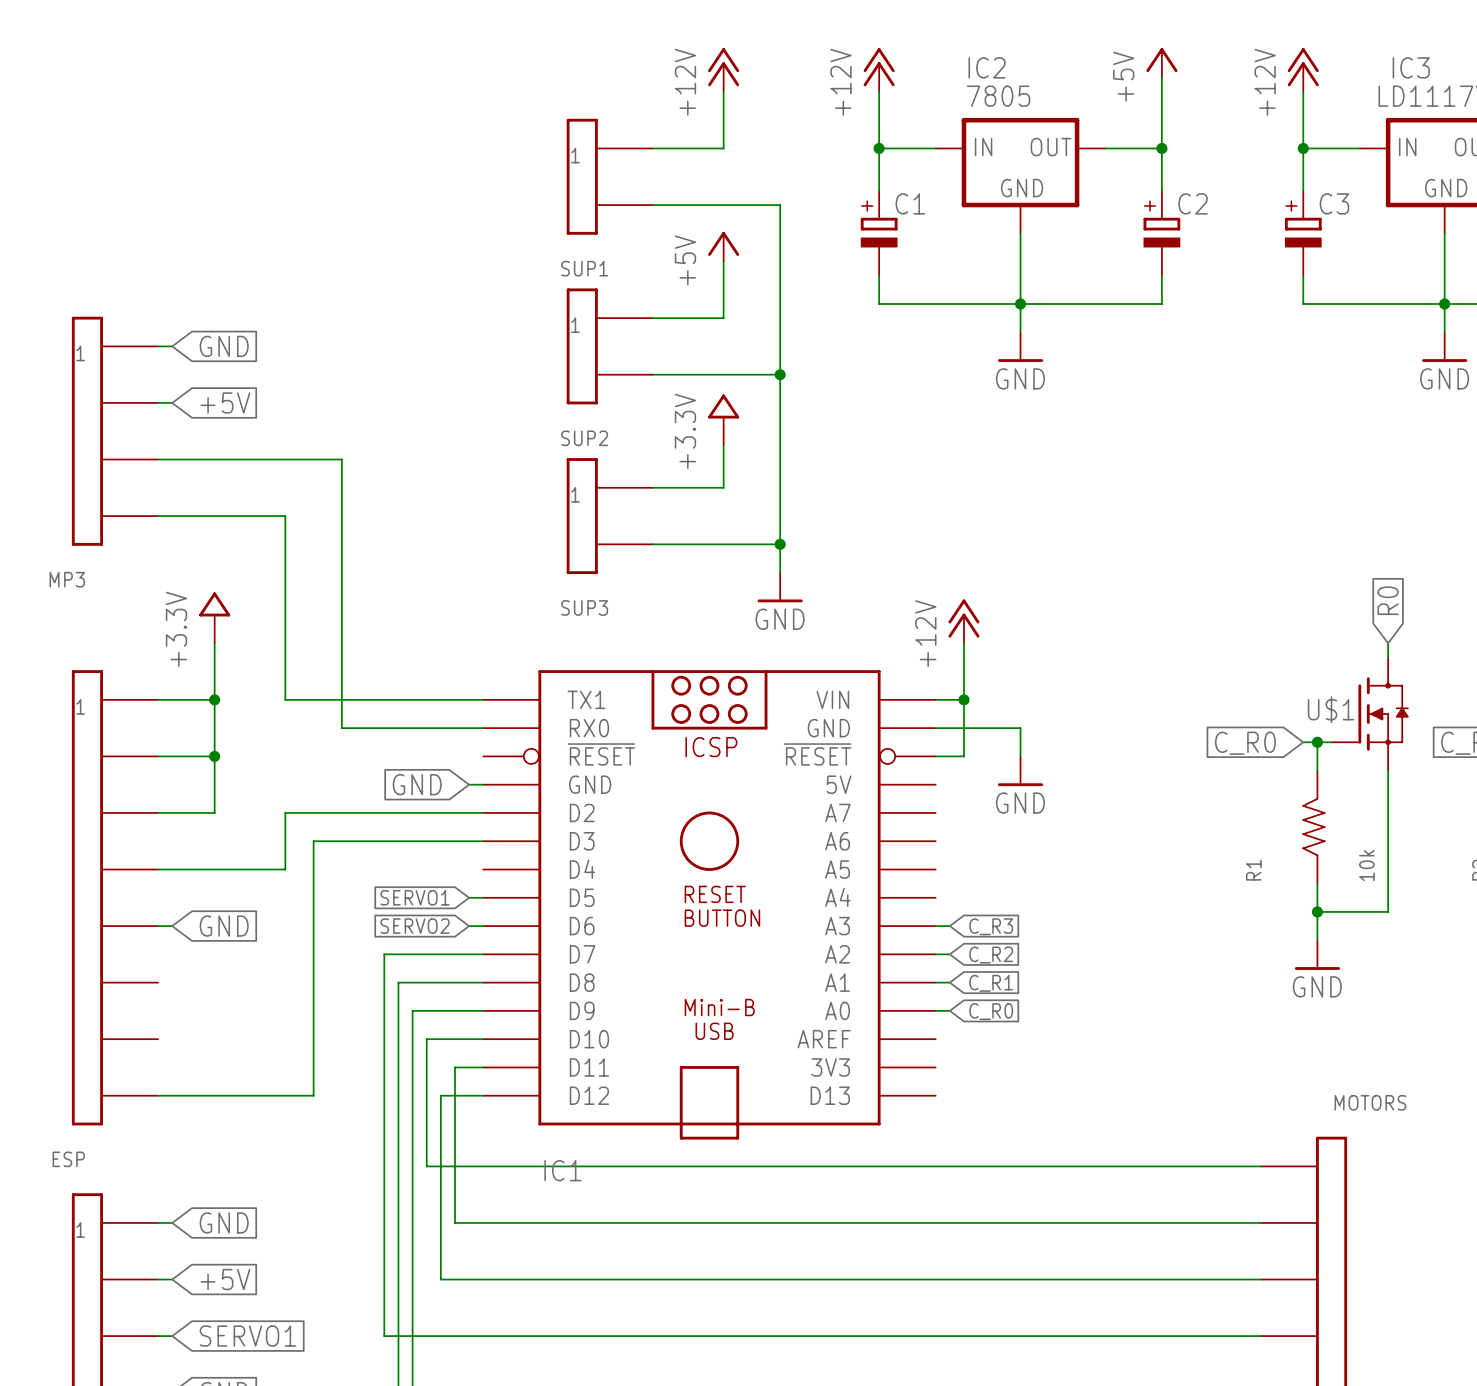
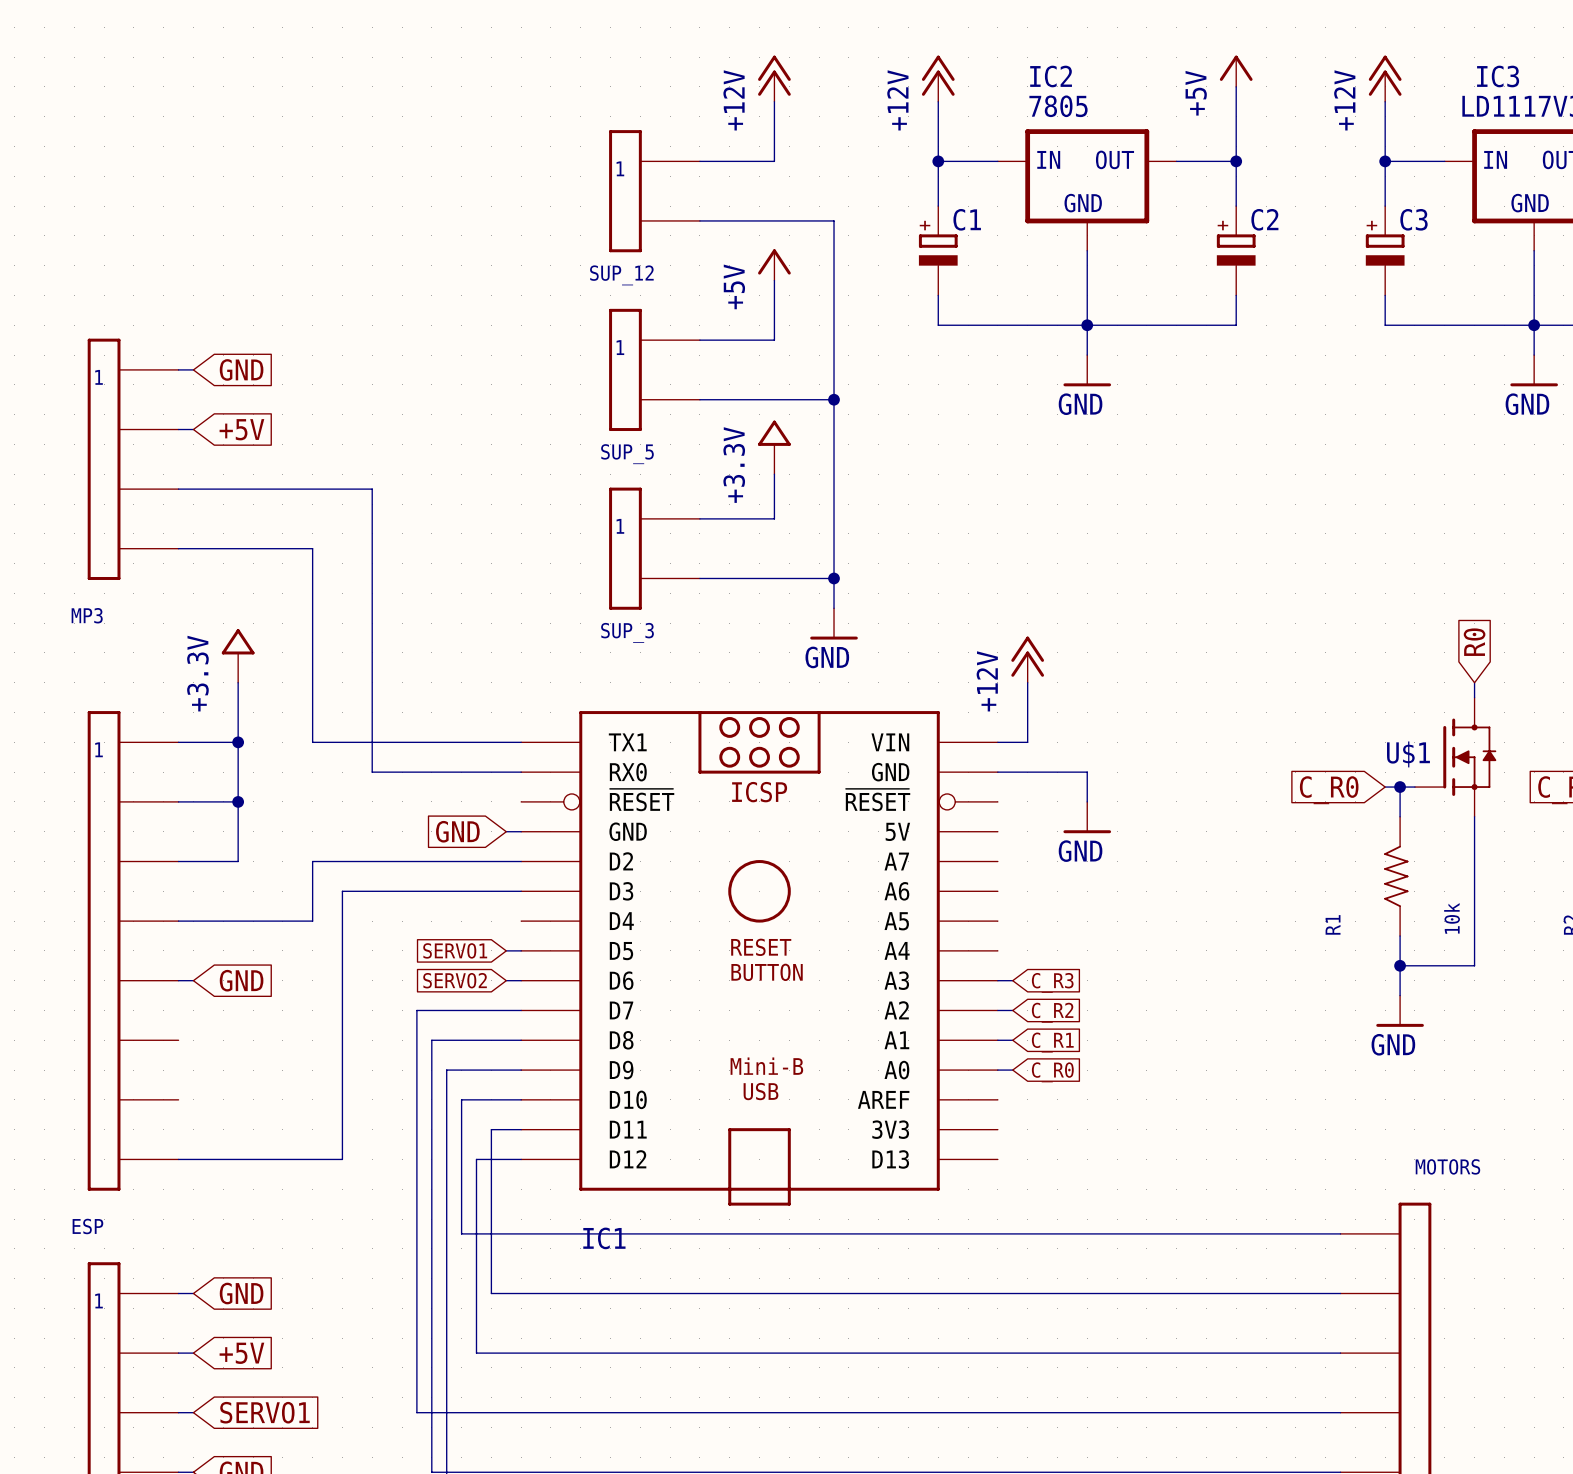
SUP1 name: SUP1 (584, 268) -> SUP_12 (621, 275)
SUP2 name: SUP2 (584, 438) -> SUP_5 (627, 454)
SUP3 name: SUP3 (584, 607) -> SUP_3 (627, 632)
wire: (963, 699) (963, 756) (935, 756) -> none
junction: (963, 699) -> none

